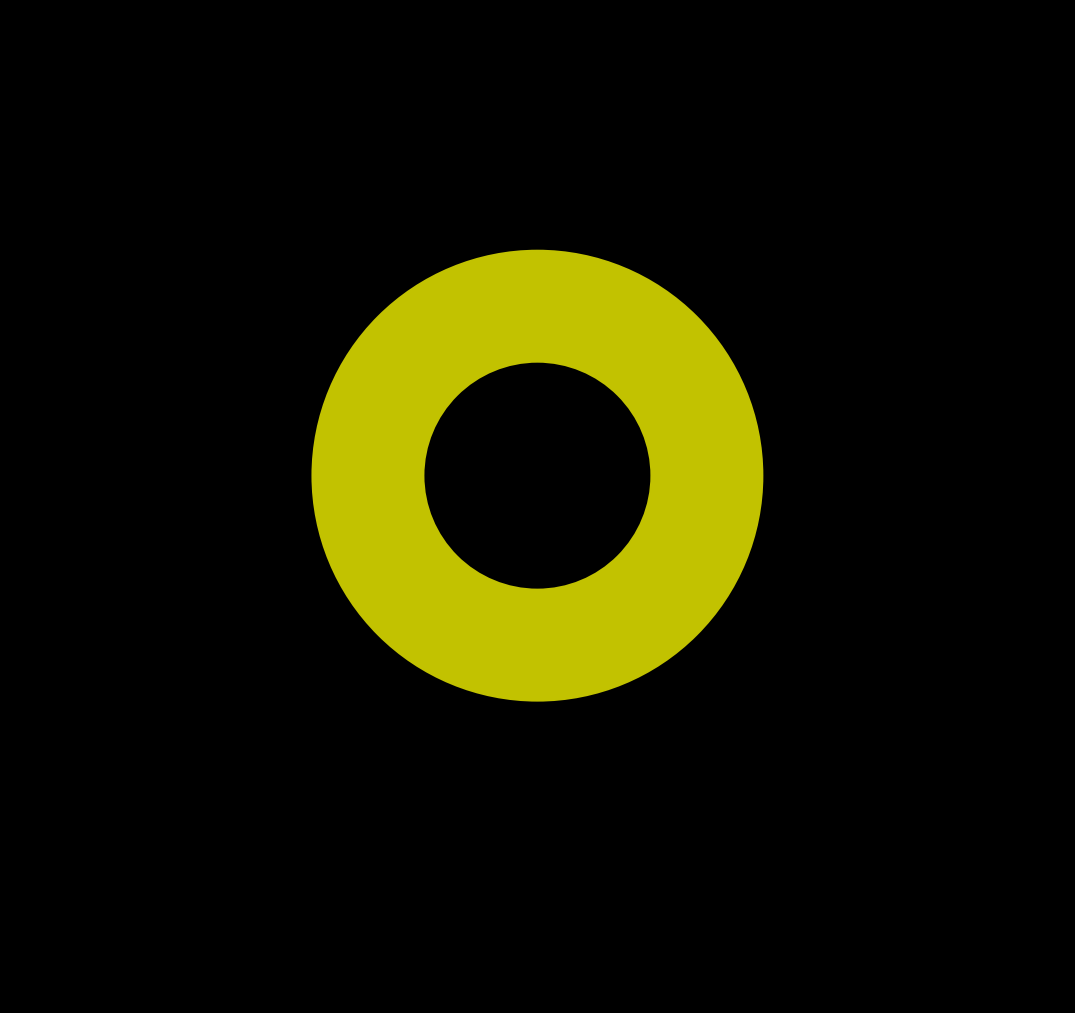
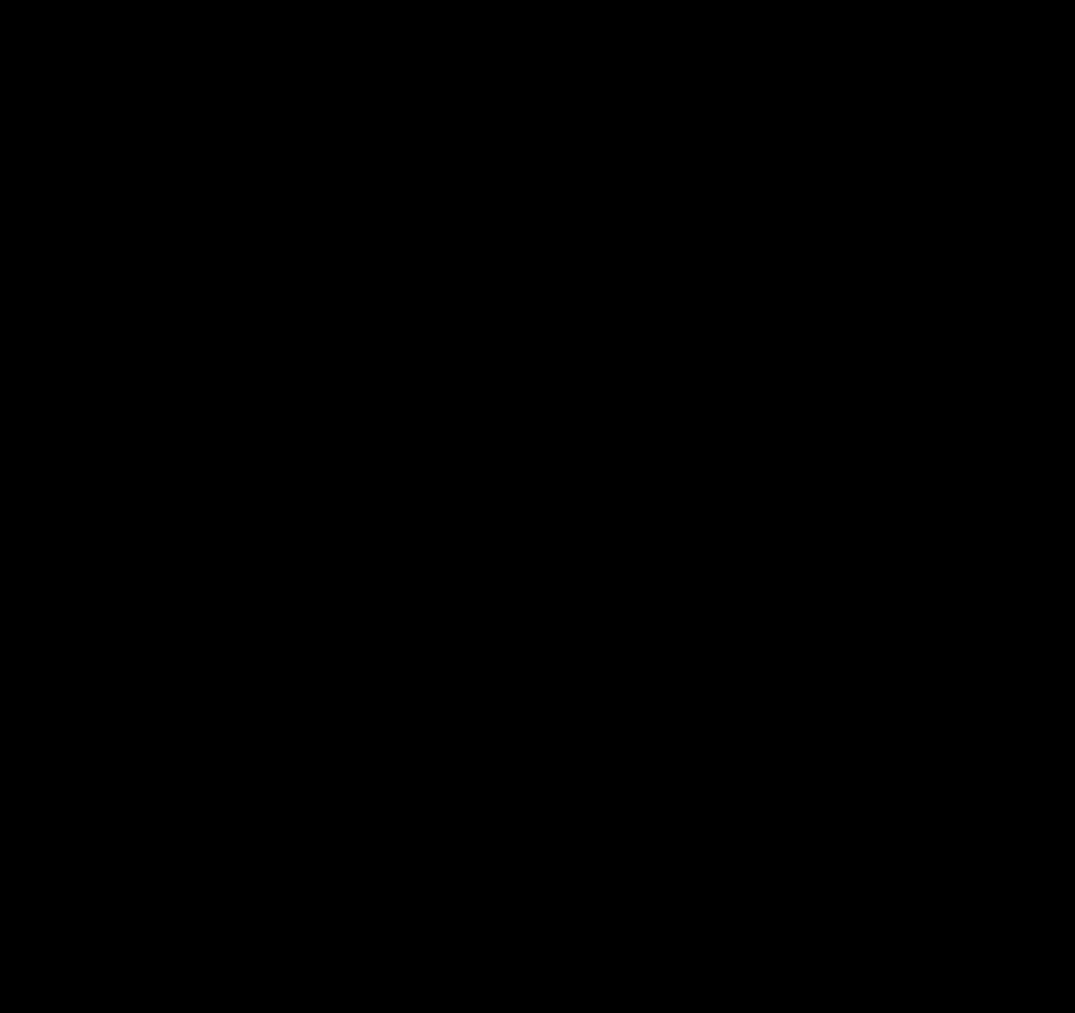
part: (537, 475) -> none

